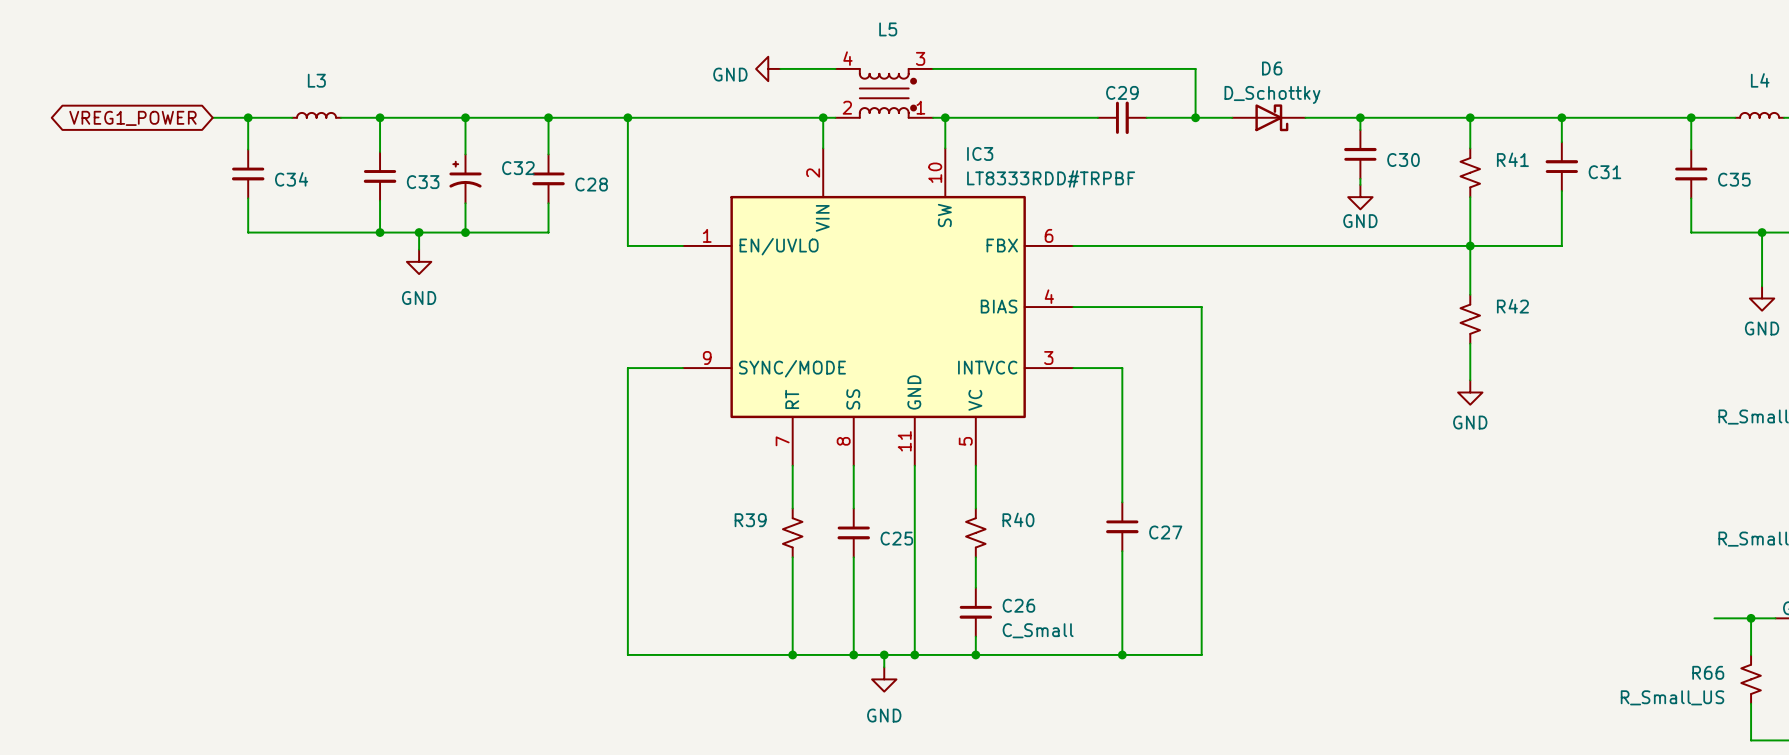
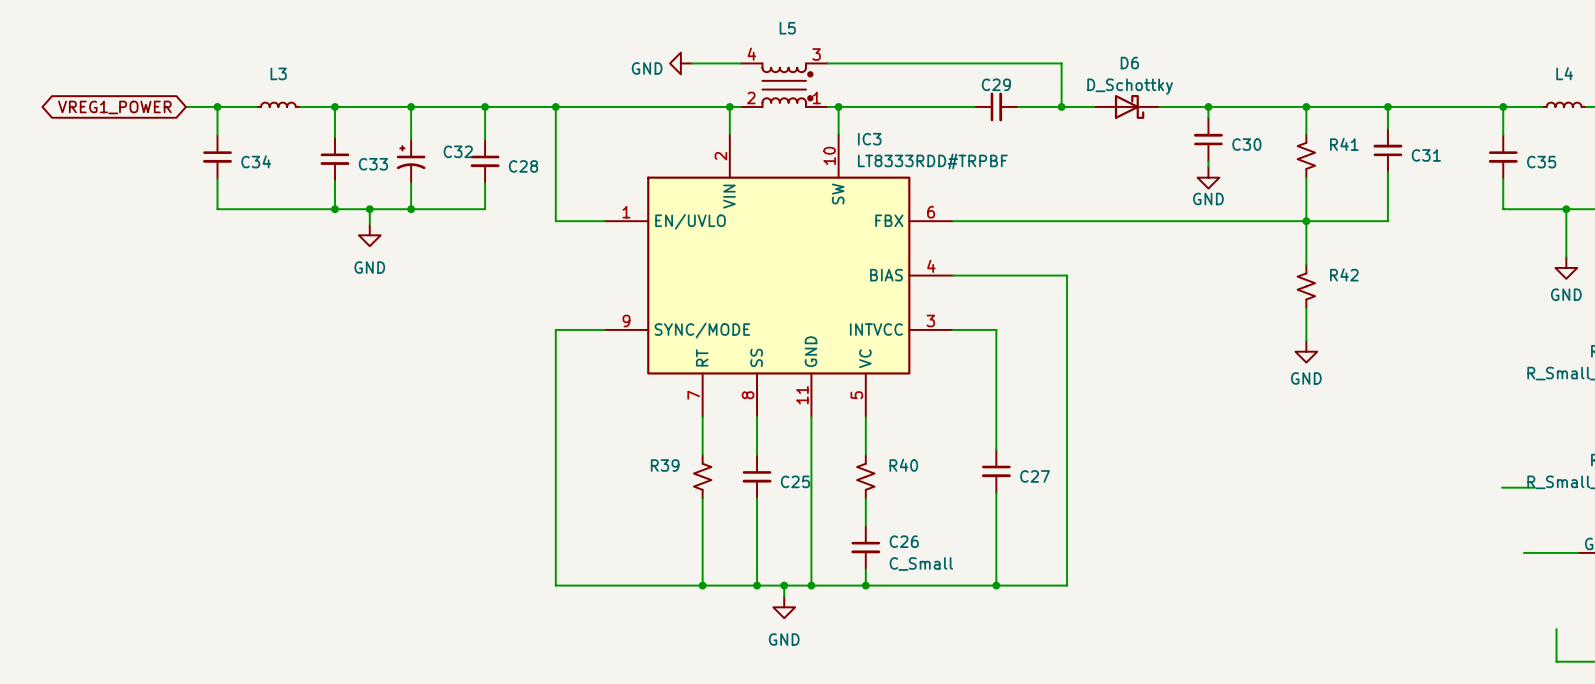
wire: none -> (1502, 487) (1534, 487)
wire: (1751, 618) (1751, 654) -> none
junction: (1751, 618) -> none
R66: R_Small_US (1751, 679) -> none

